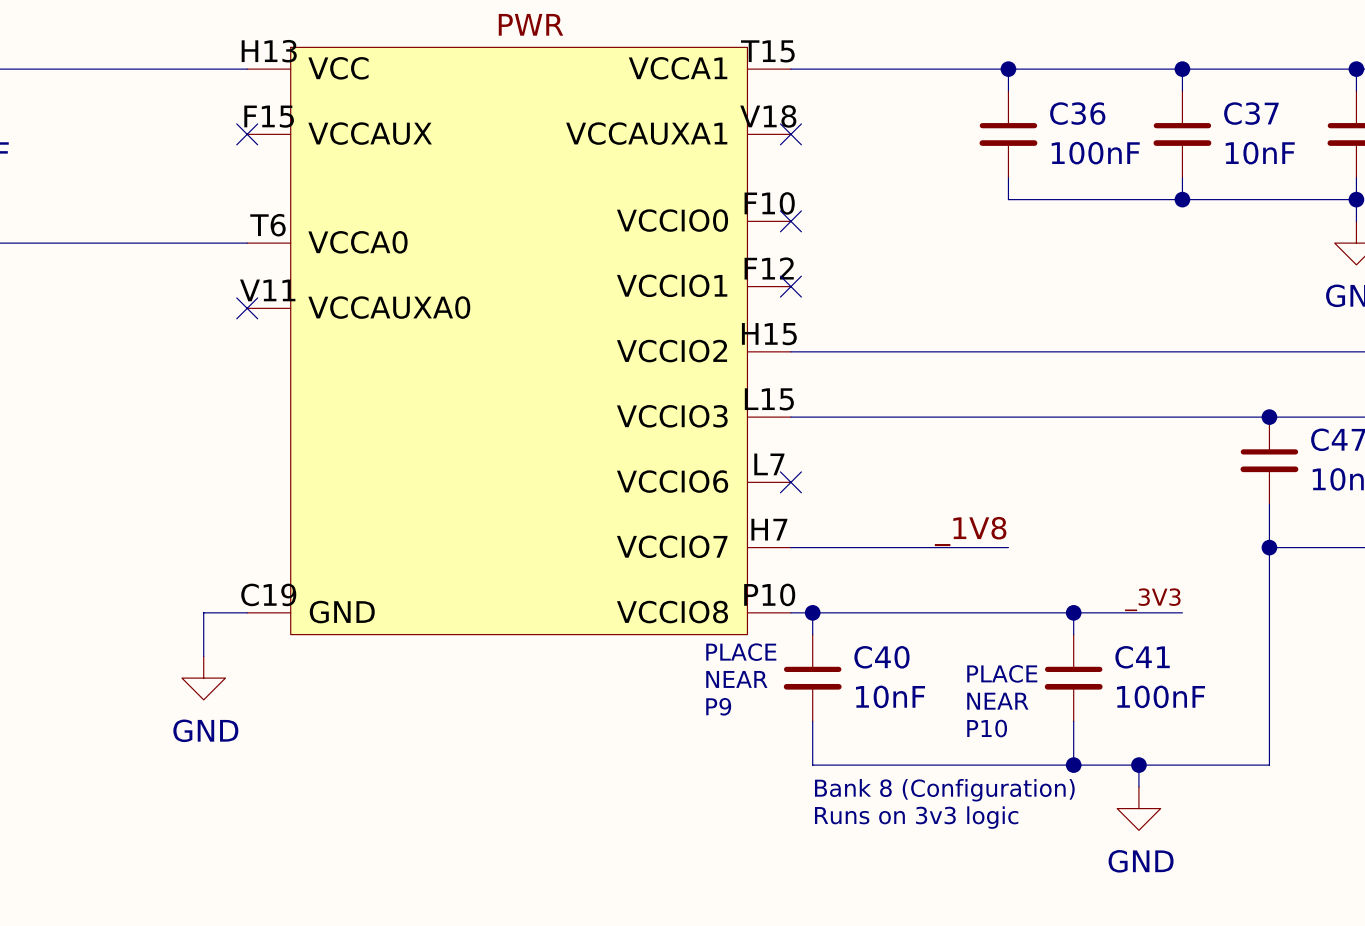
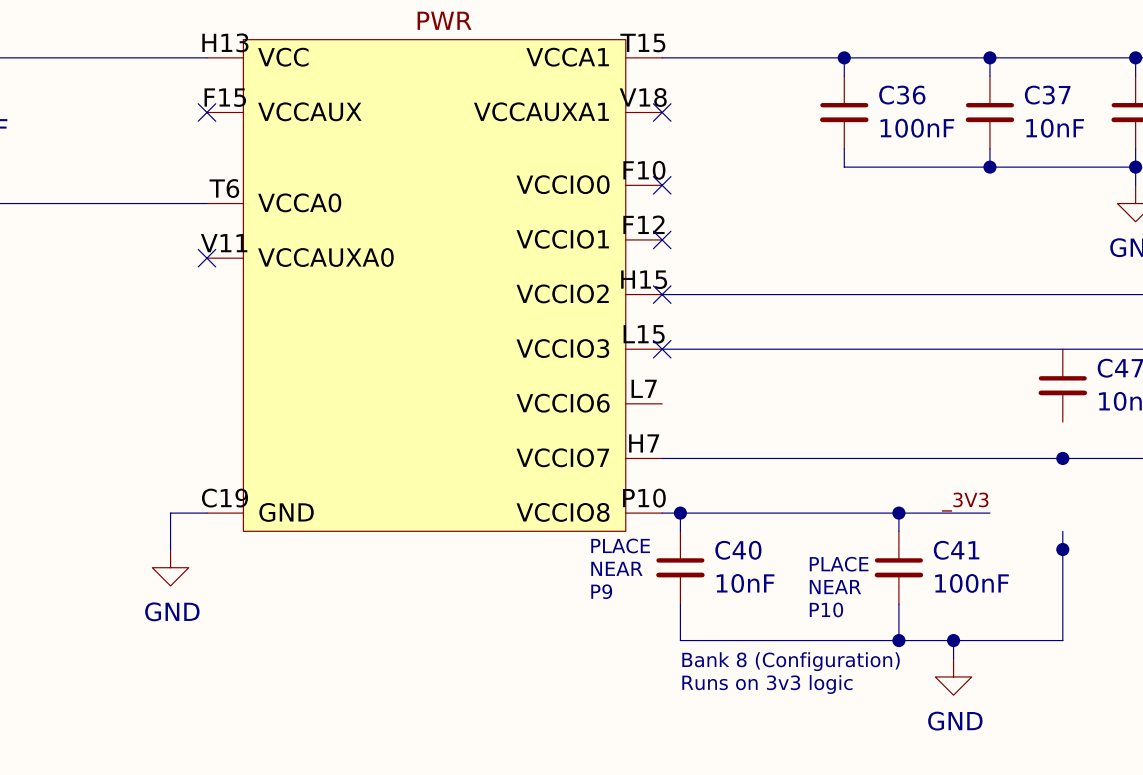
no-connect mark: none -> (662, 294)
no-connect mark: none -> (662, 349)
junction: (1269, 417) -> none
no-connect mark: (790, 482) -> none
wire: (1269, 504) (1269, 634) -> none
label: _1V8 (970, 531) -> none
wire: none -> (844, 458) (1062, 458)
junction: none -> (1062, 549)

